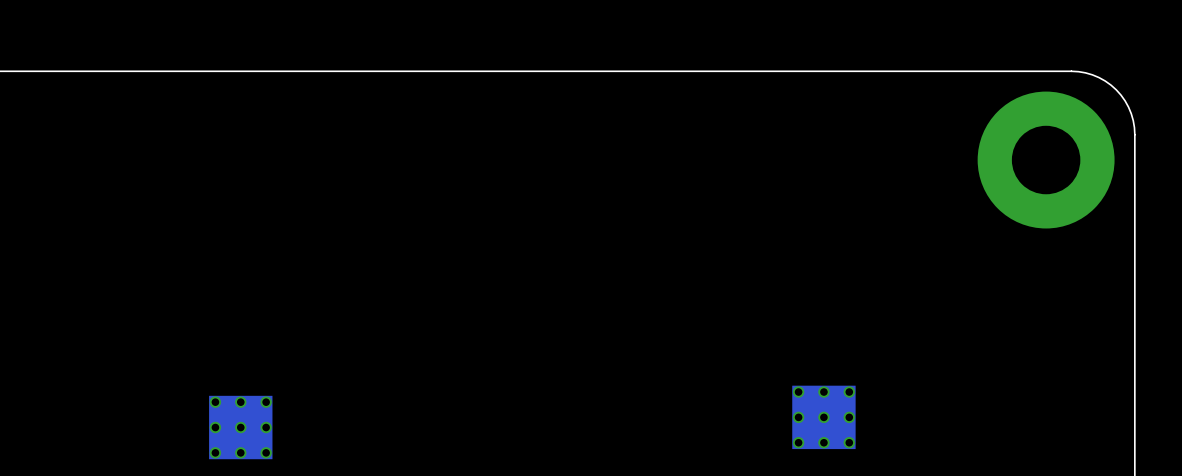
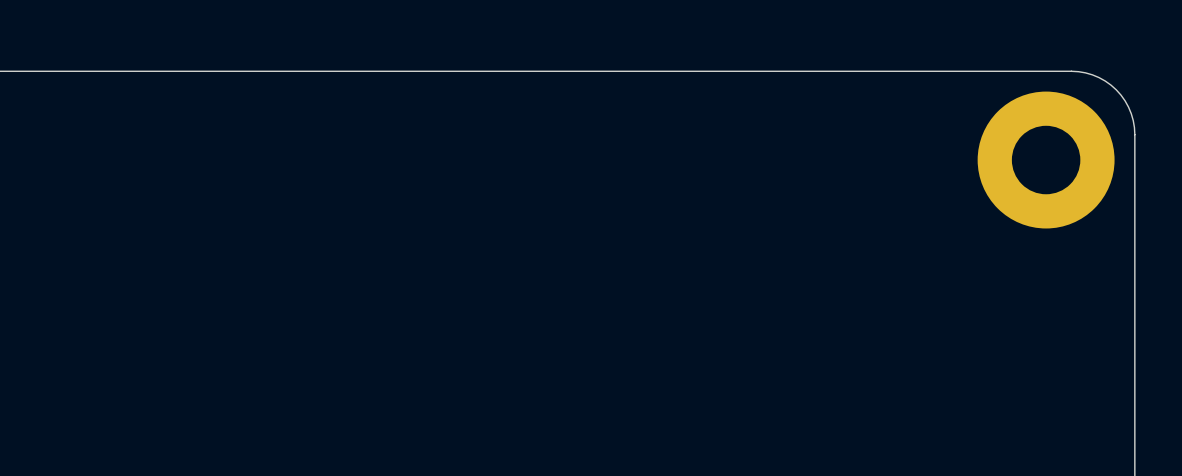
part: (823, 417) -> none
part: (240, 427) -> none

